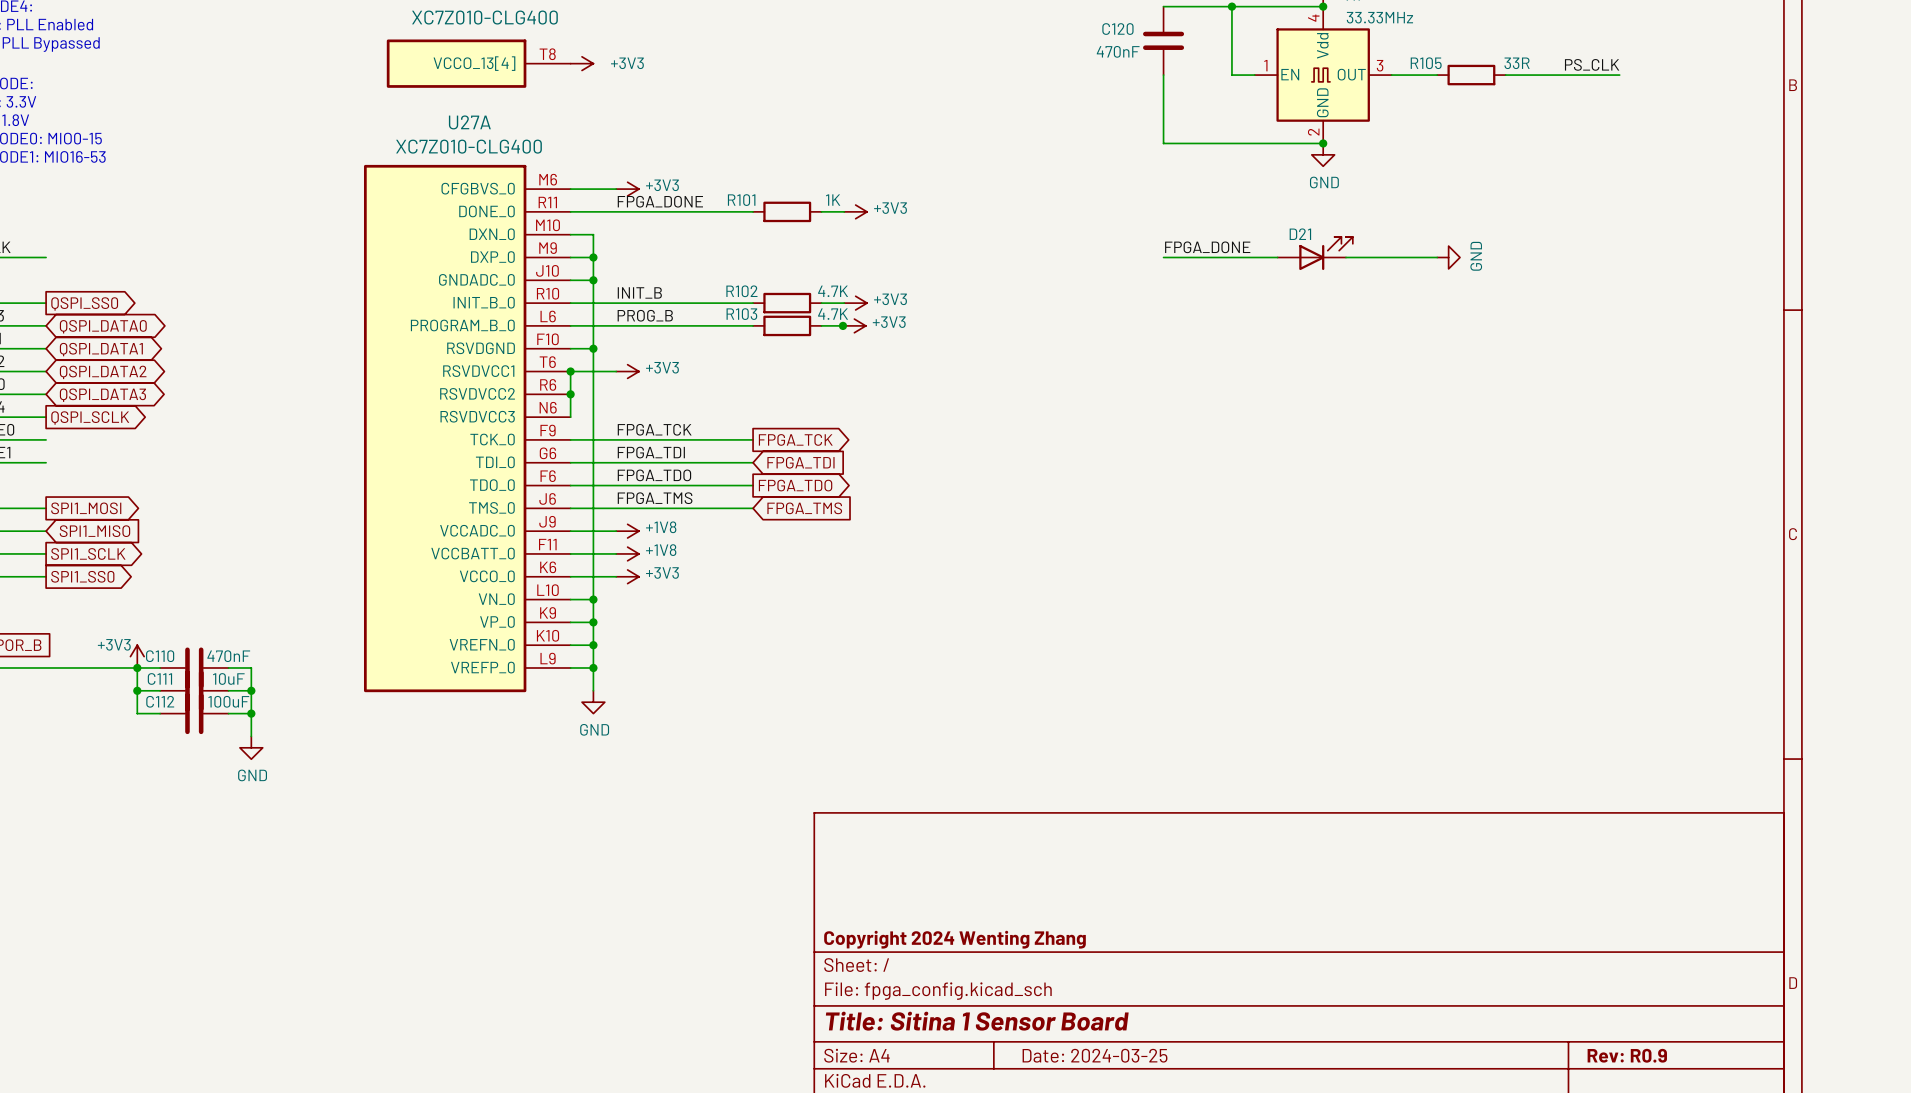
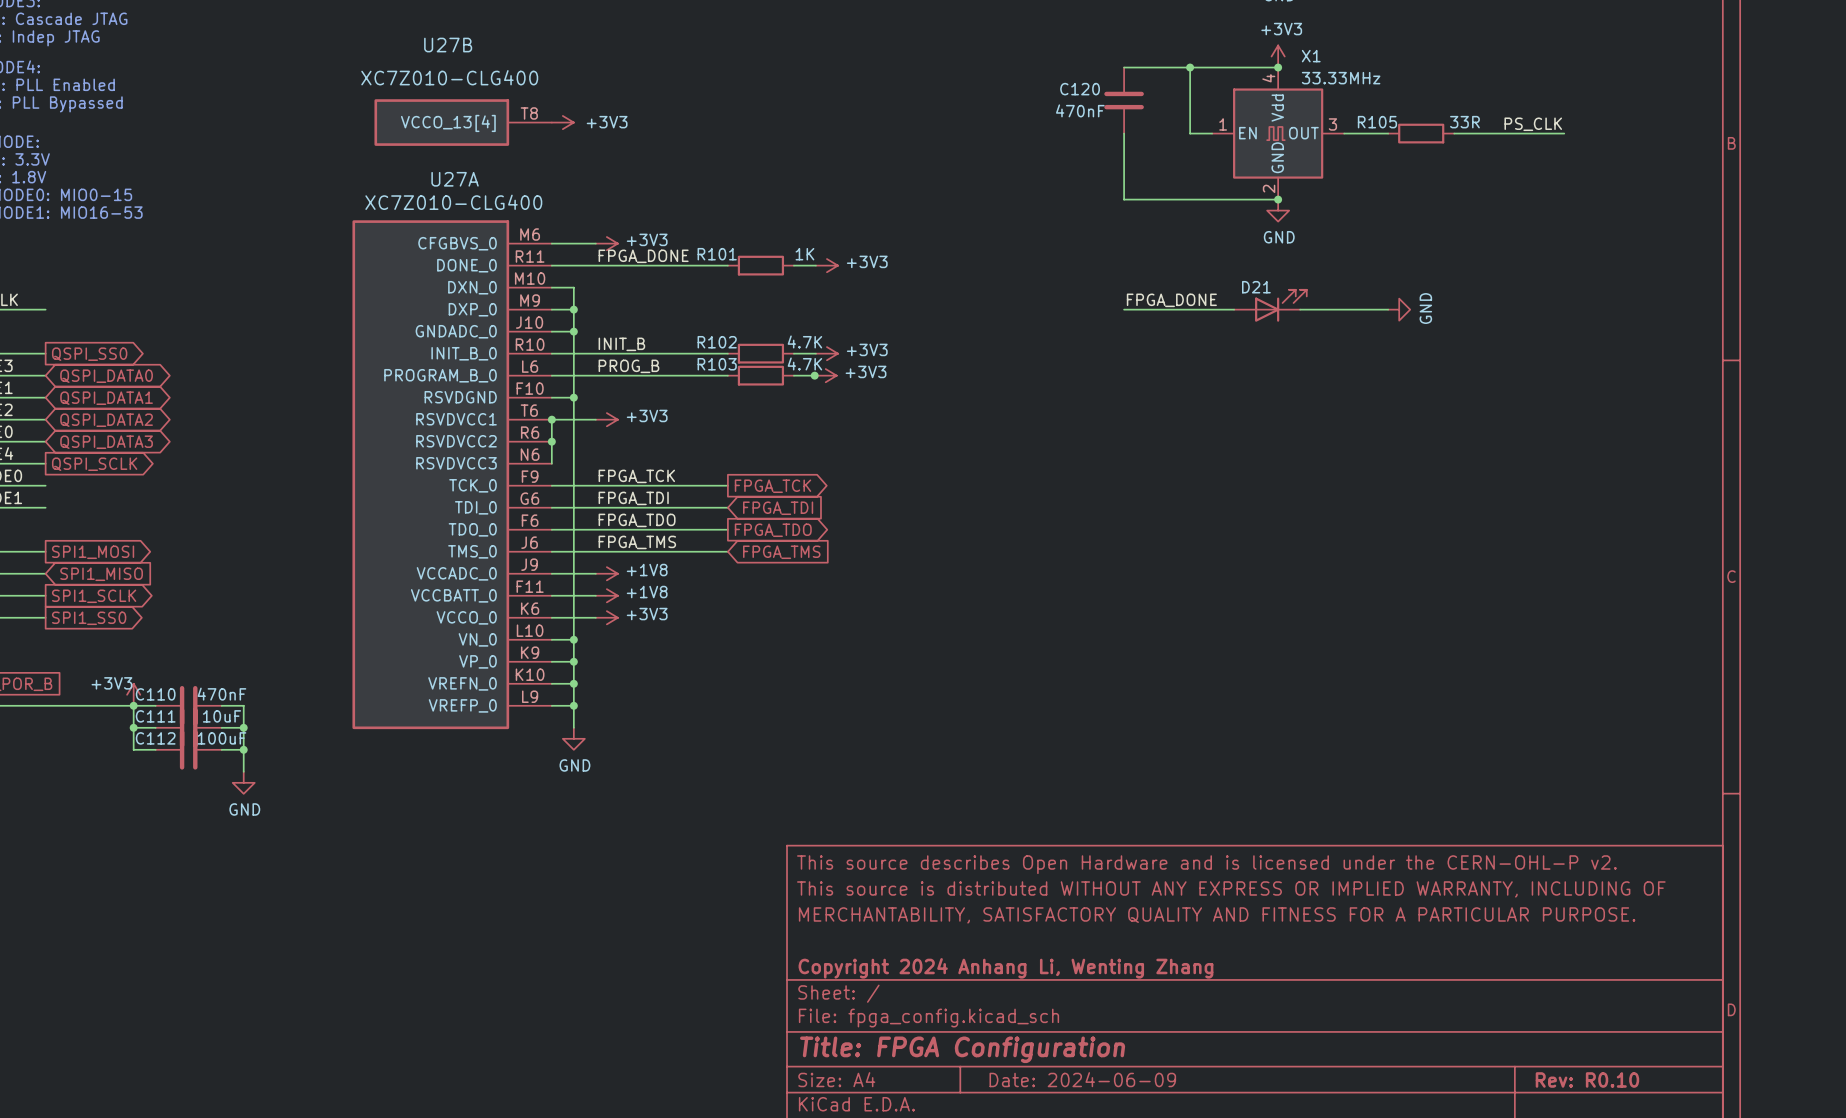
title block: none -> This source describes Open Hardware and is licensed under the CERN-OHL-P v2. (1206, 864)
title block: none -> This source is distributed WITHOUT ANY EXPRESS OR IMPLIED WARRANTY, INCLUDING OF (1231, 889)
title block: none -> MERCHANTABILITY, SATISFACTORY QUALITY AND FITNESS FOR A PARTICULAR PURPOSE. (1217, 915)
title block: Copyright 2024 Wenting Zhang (955, 939) -> Copyright 2024 Anhang Li, Wenting Zhang (1005, 968)
title block: Title: Sitina 1 Sensor Board (977, 1021) -> Title: FPGA Configuration (962, 1049)
title block: Date: 2024-03-25 (1095, 1055) -> Date: 2024-06-09 (1082, 1079)
title block: Rev: R0.9 (1627, 1055) -> Rev: R0.10 (1587, 1079)

